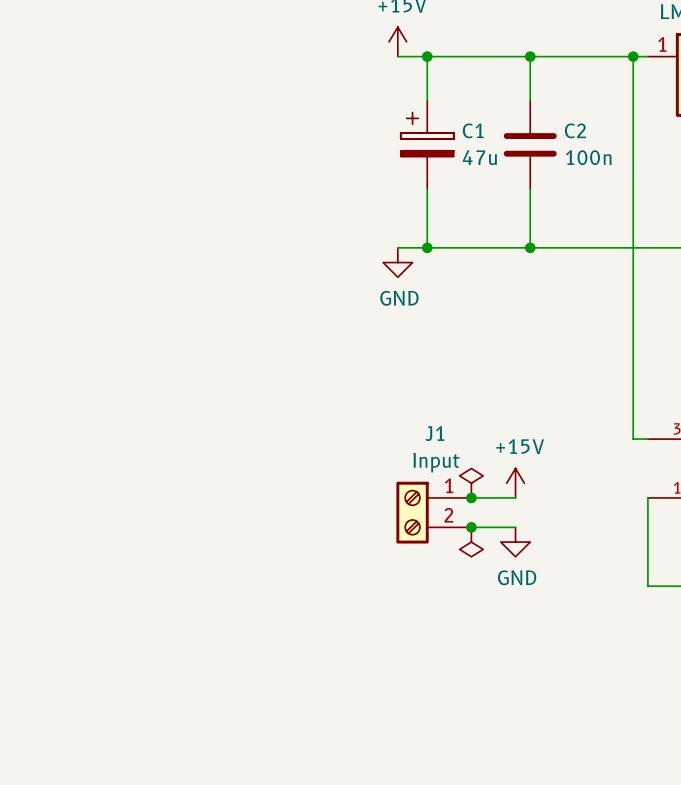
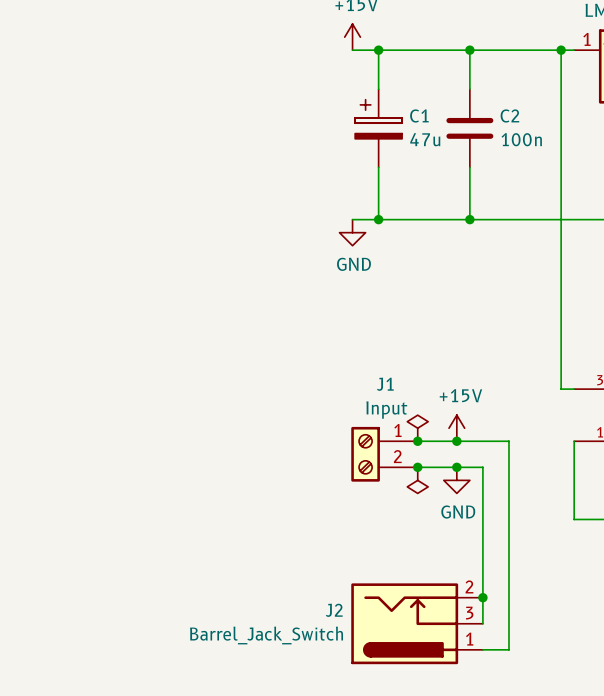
wire: none -> (456, 441) (508, 441) (508, 649) (482, 649)
junction: none -> (456, 441)
wire: none -> (456, 467) (482, 467) (482, 623)
junction: none -> (456, 467)
junction: none -> (482, 597)
J2: none -> Barrel_Jack_Switch (417, 623)

